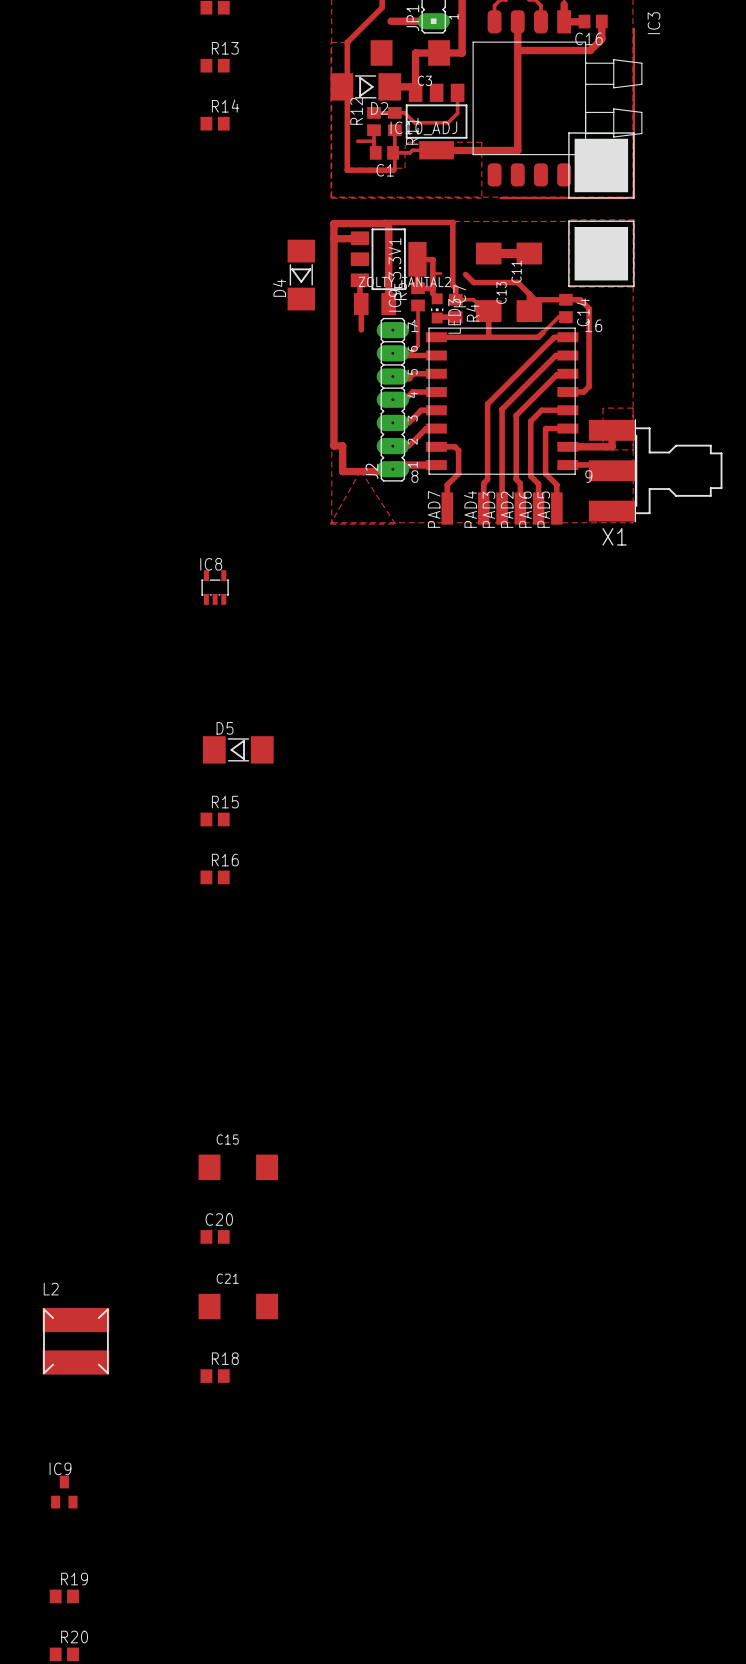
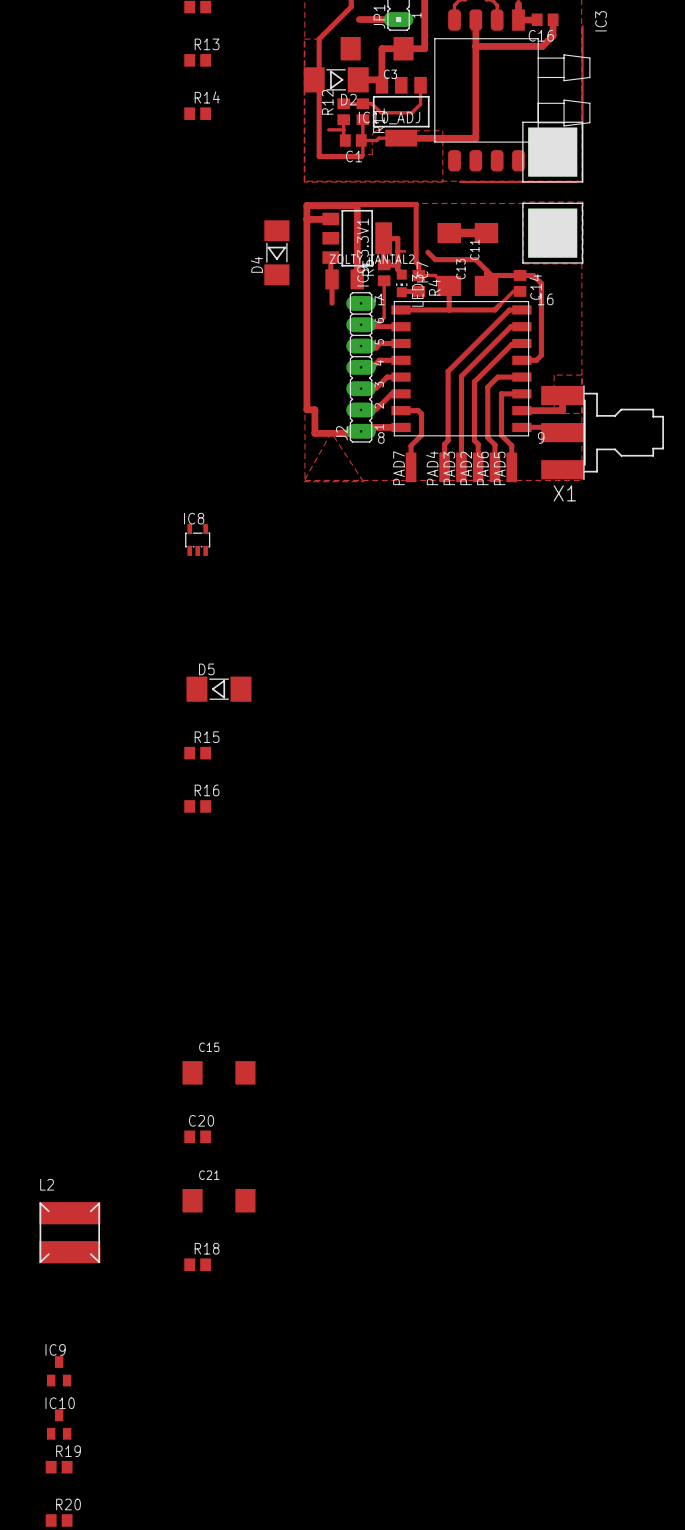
IC10: none -> (59, 1424)

